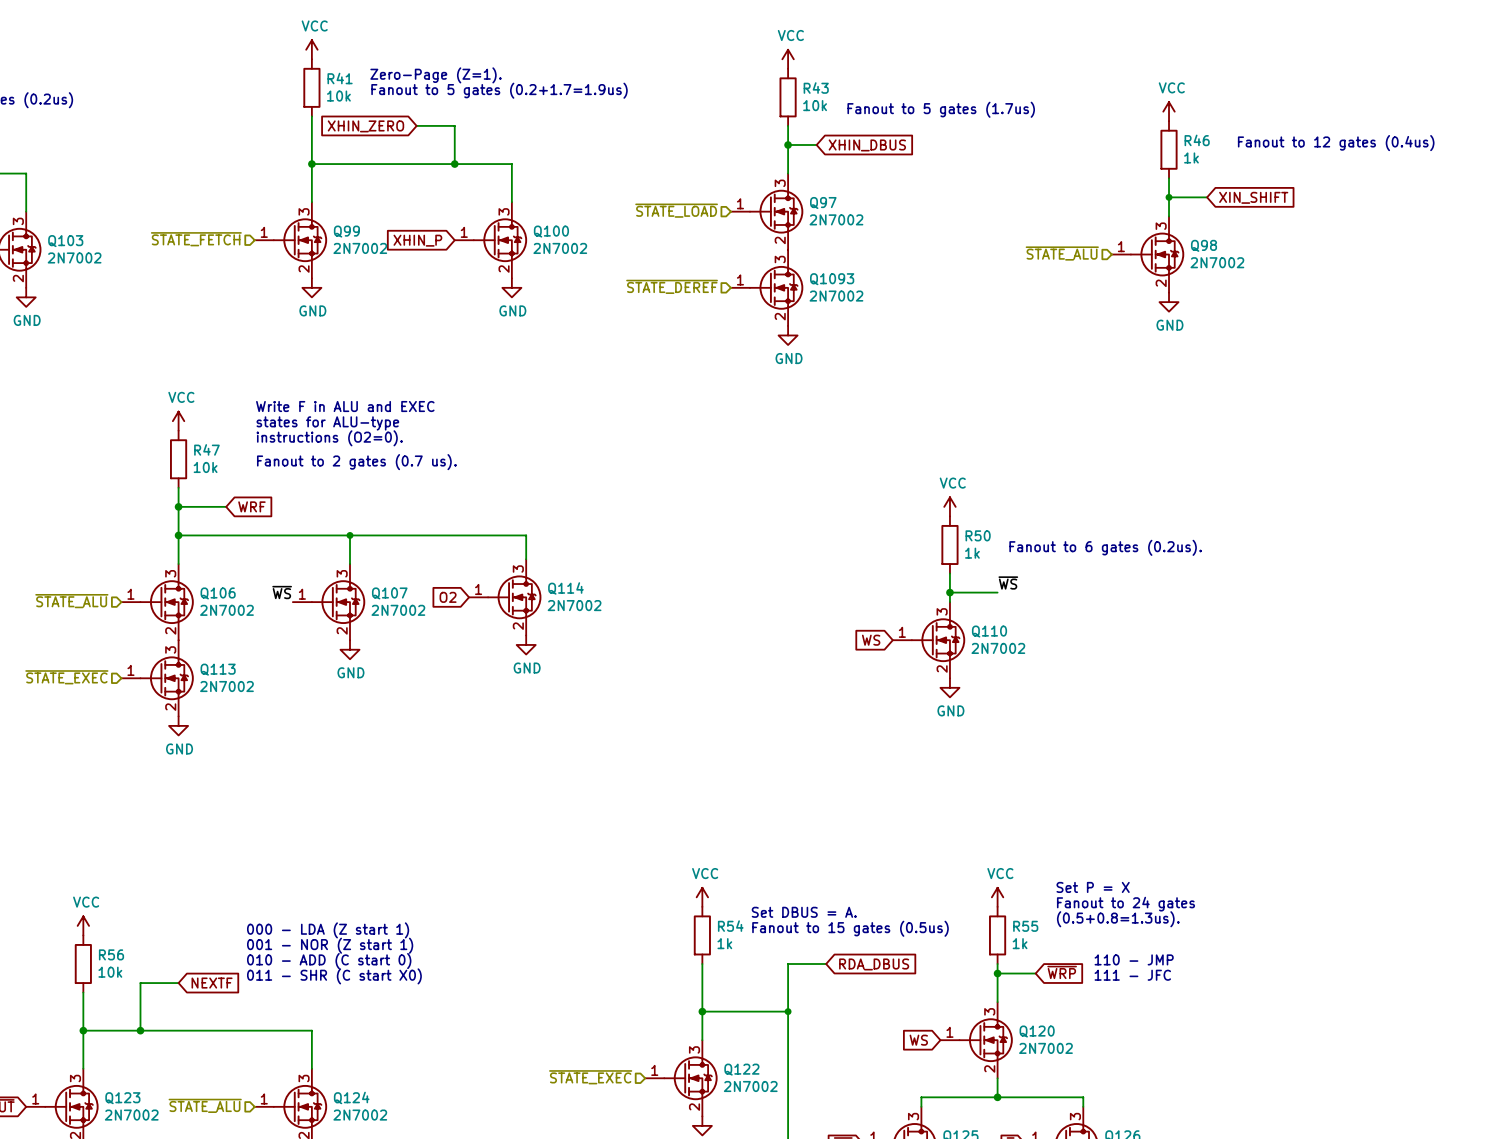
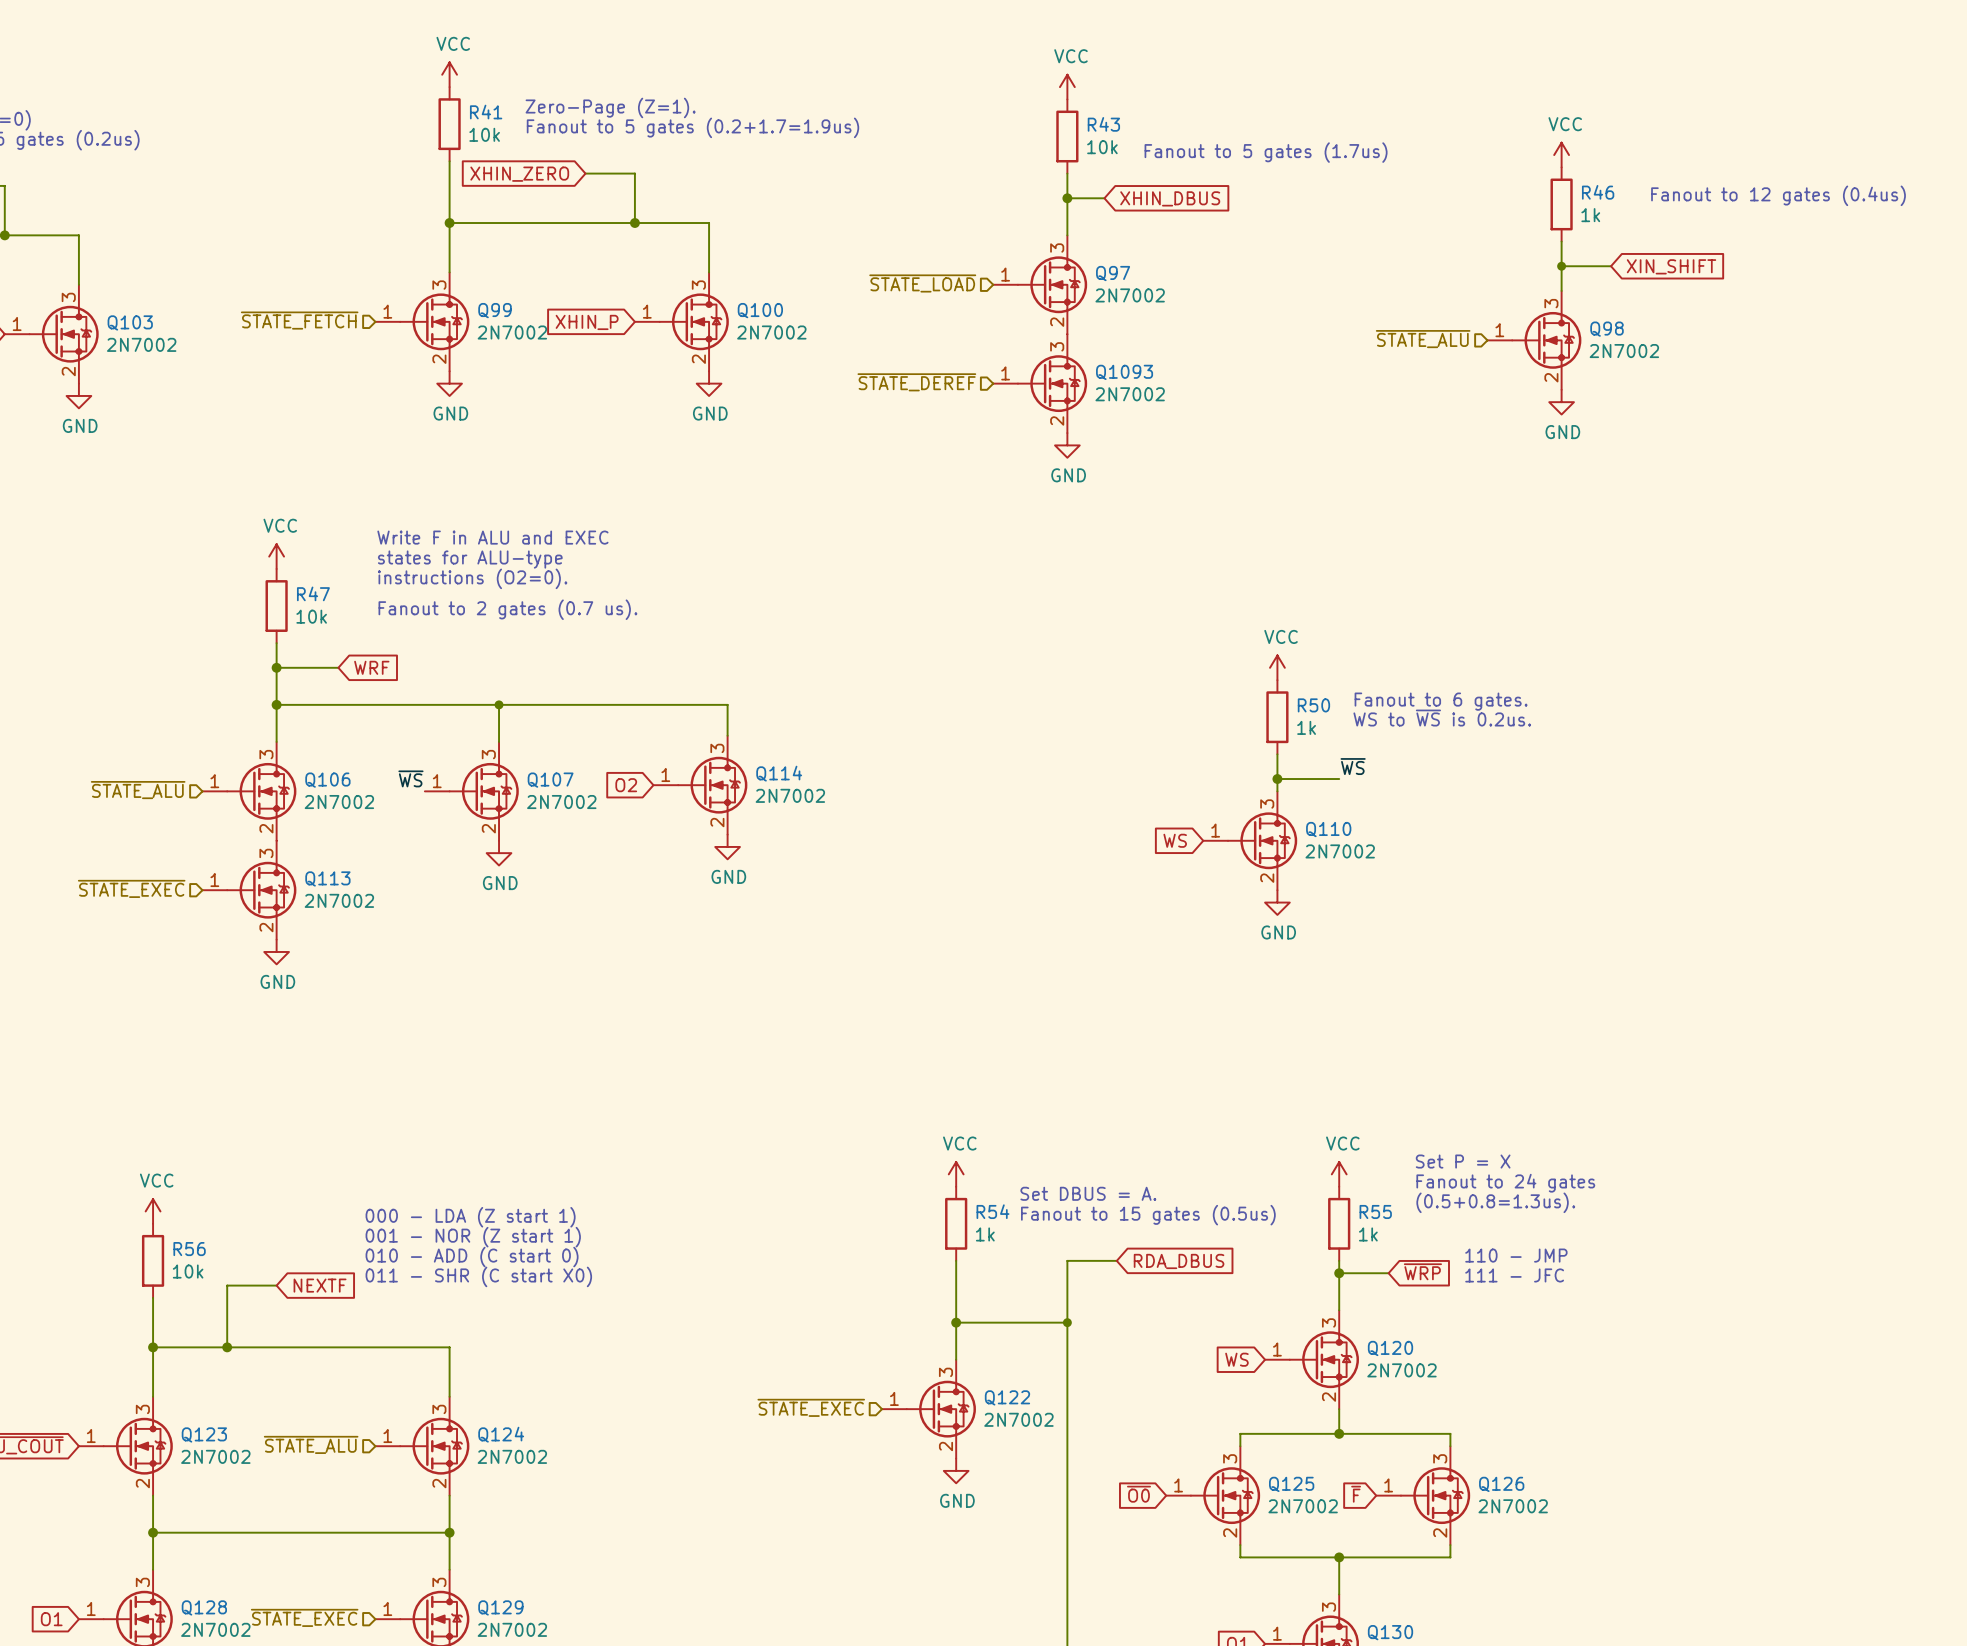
text: none -> Fanout to 6 gates. (1441, 701)
text: Fanout to 6 gates (0.2us). (1105, 547) -> WS to ~{WS} is 0.2us. (1442, 718)

